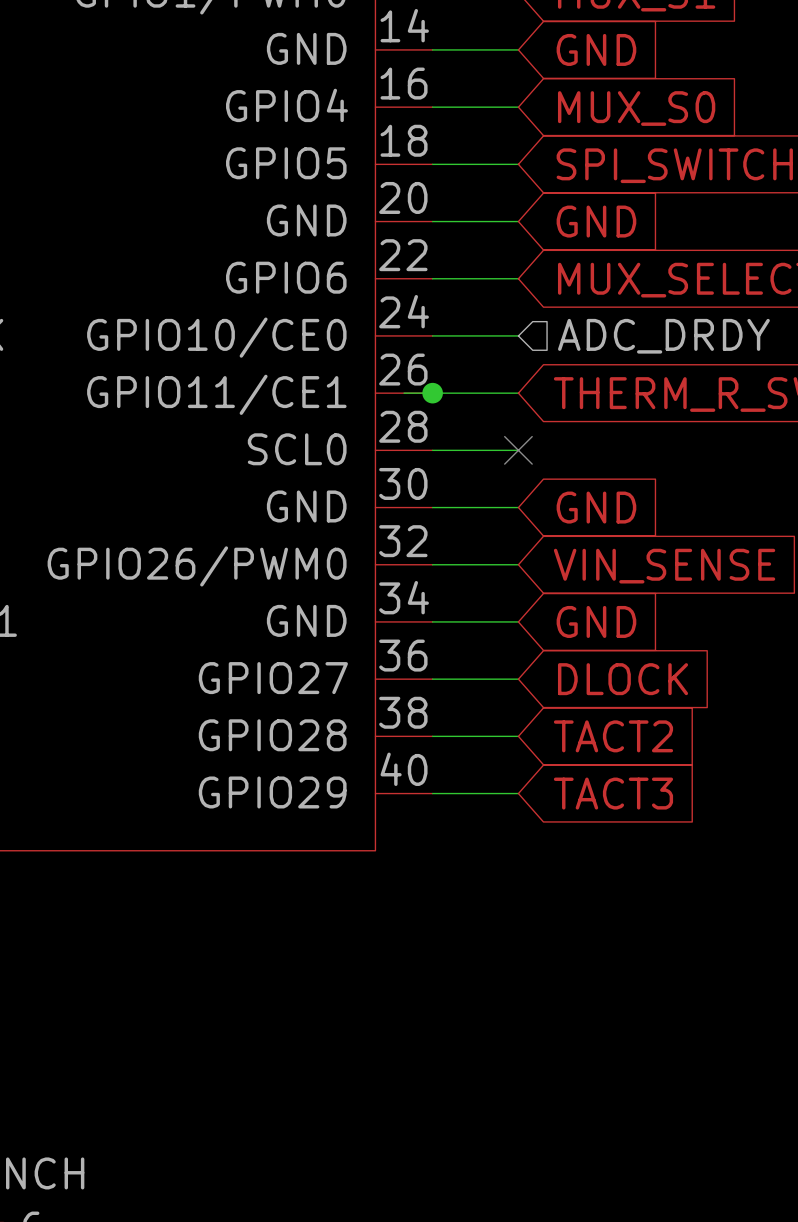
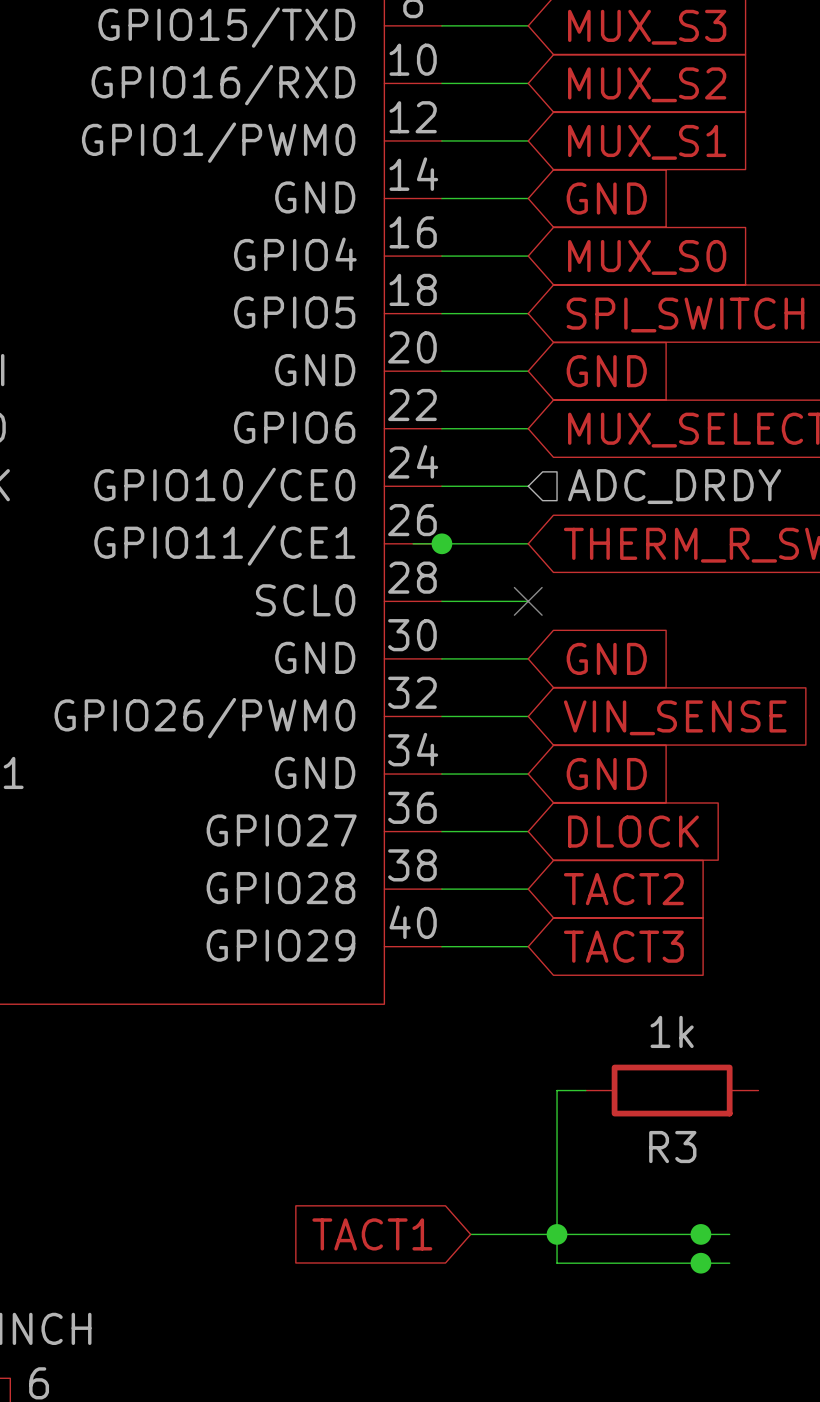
wire: none -> (585, 1090) (557, 1090) (557, 1263) (729, 1263)
R3: none -> 1k (672, 1090)
global label: none -> TACT1 (372, 1234)
wire: none -> (470, 1234) (729, 1234)
junction: none -> (557, 1234)
junction: none -> (700, 1234)
junction: none -> (700, 1263)

